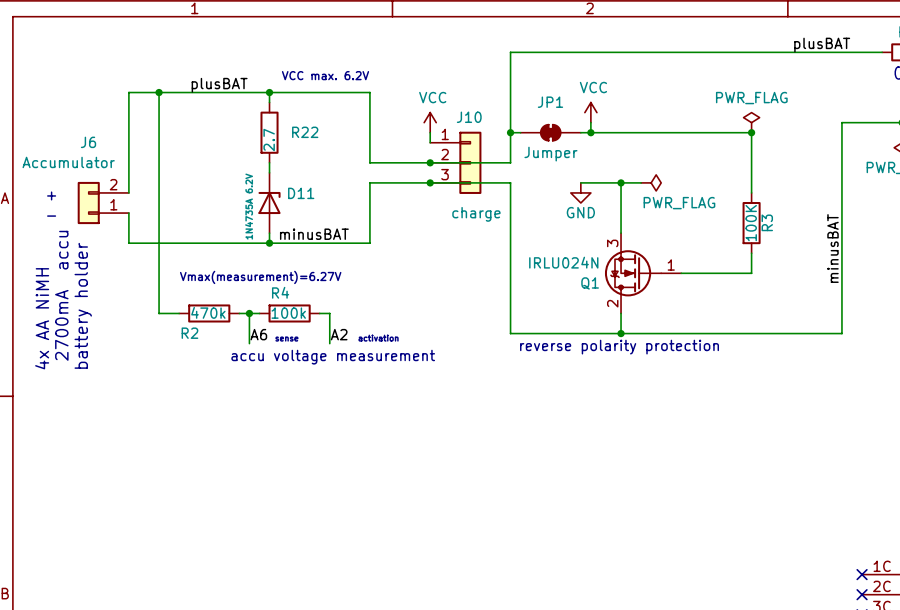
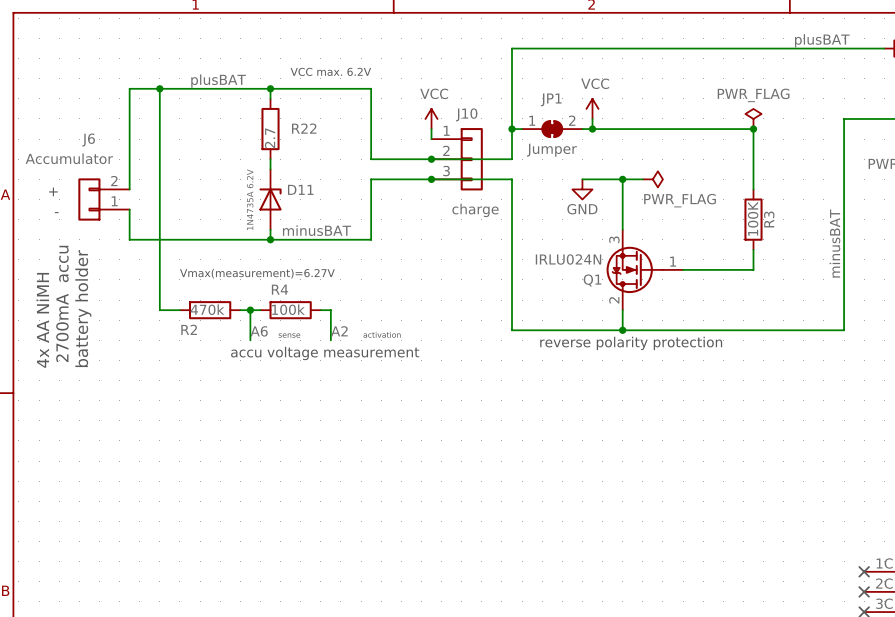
JP1 pin number: none -> 1 (532, 120)
JP1 pin number: none -> 2 (572, 120)

